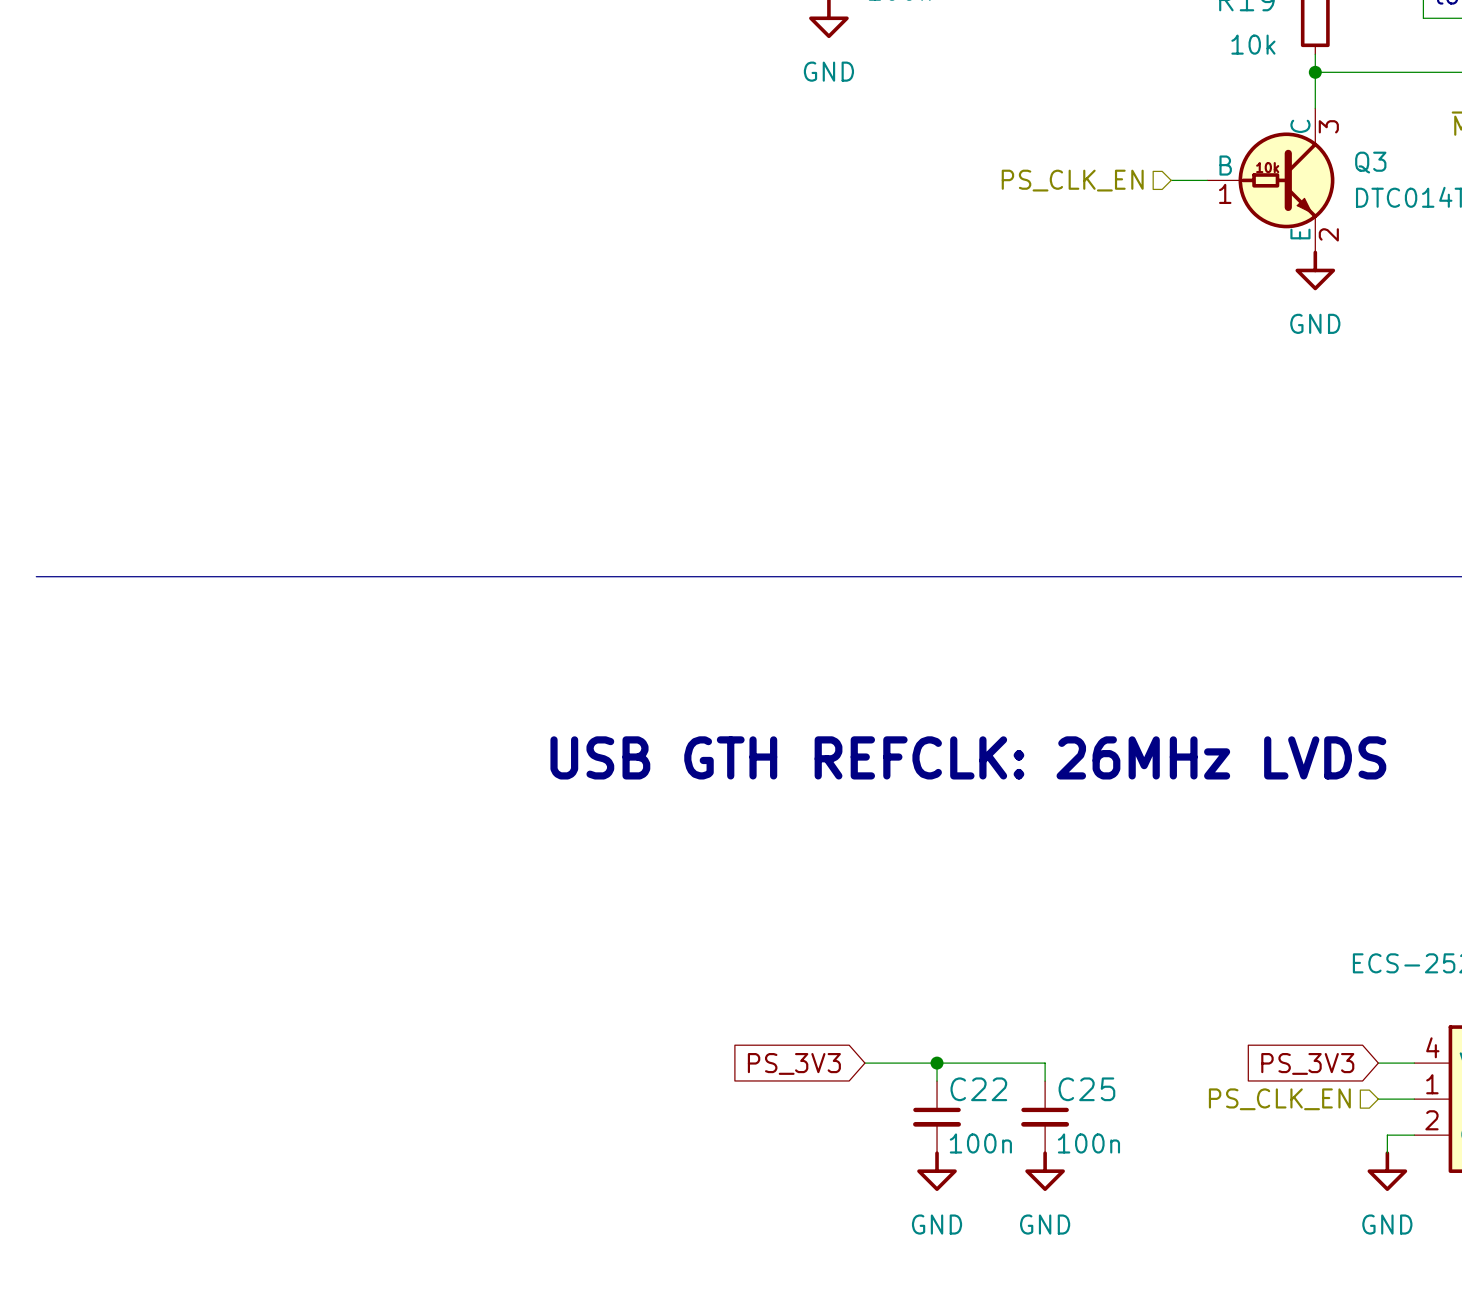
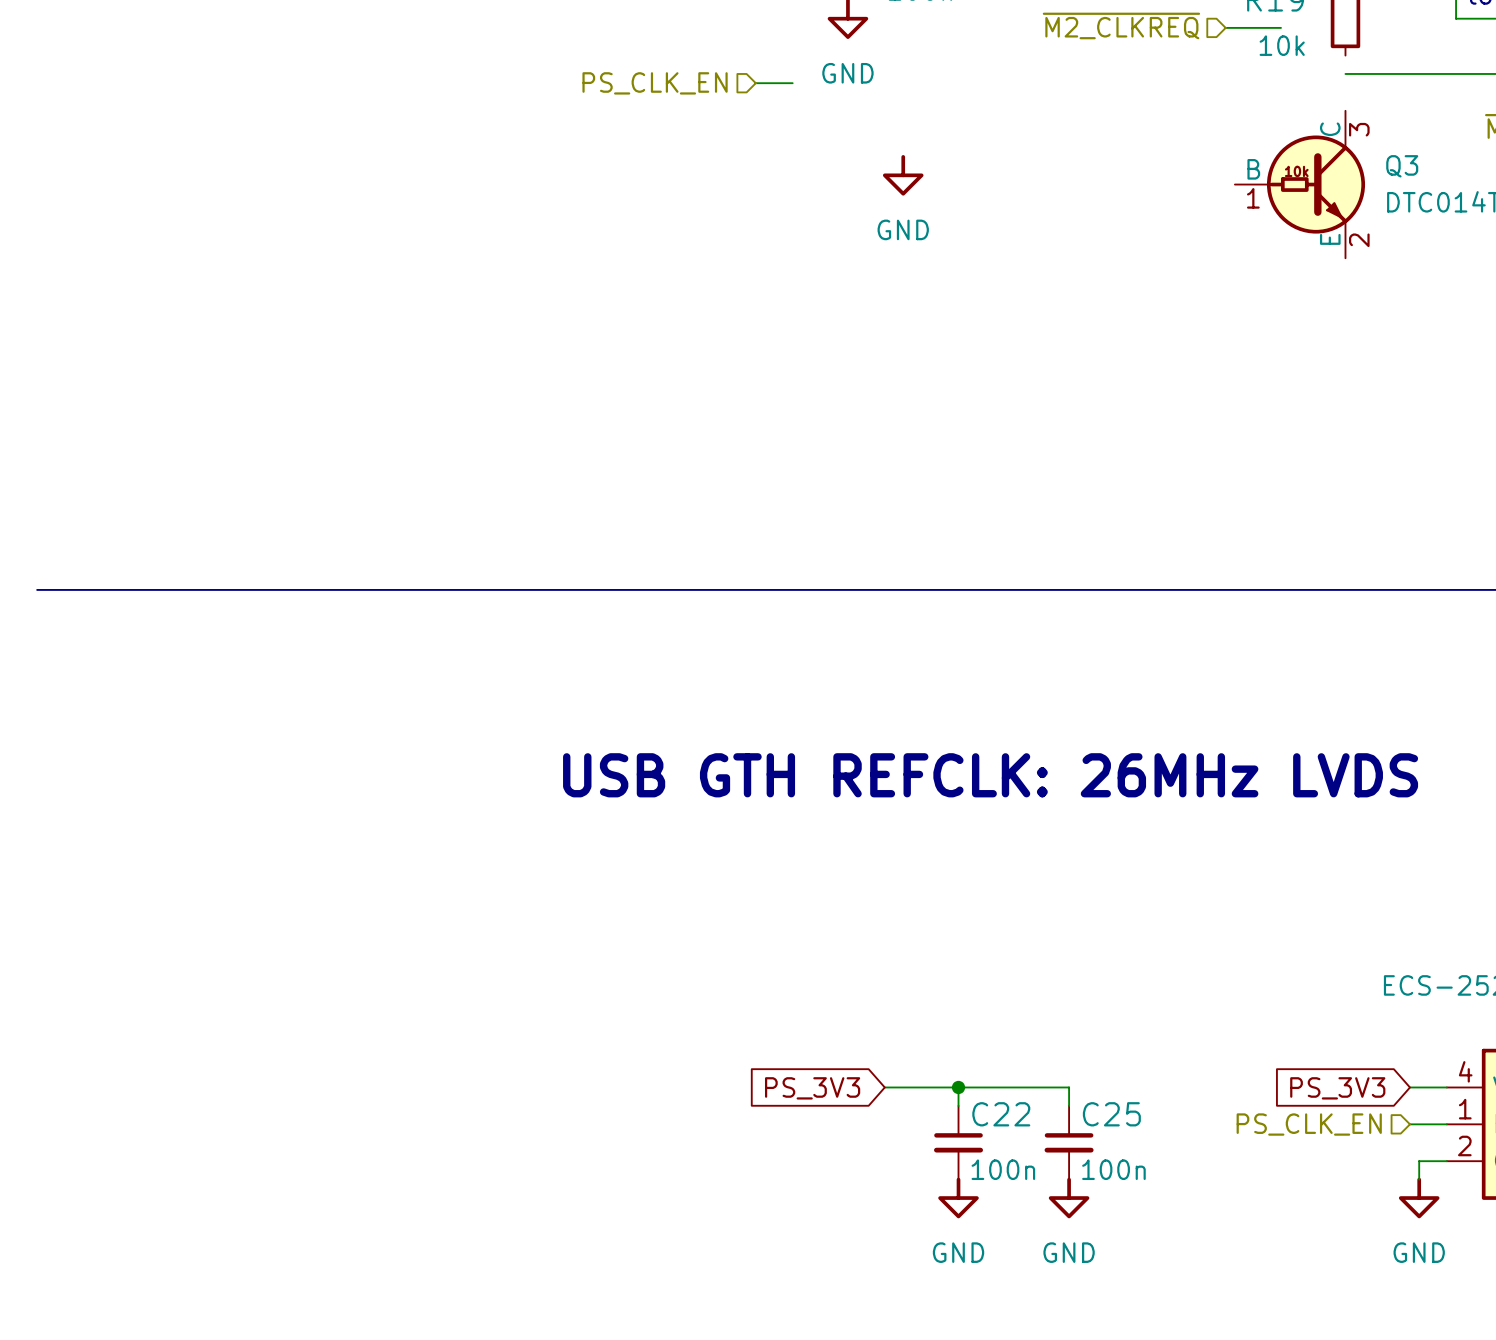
hierarchical label: none -> ~{M2_CLKREQ} (1121, 25)
wire: none -> (1225, 27) (1280, 27)
wire: (1315, 54) (1315, 108) -> none
junction: (1315, 72) -> none
hierarchical label: none -> PS_CLK_EN (655, 83)
wire: none -> (755, 83) (792, 83)
power symbol: none -> GND (903, 175)
hierarchical label: PS_CLK_EN (1072, 180) -> none
wire: (1171, 180) (1207, 180) -> none
power symbol: GND (1315, 270) -> none

